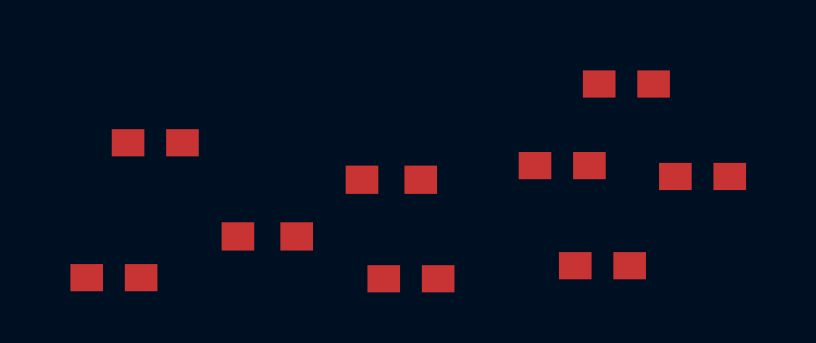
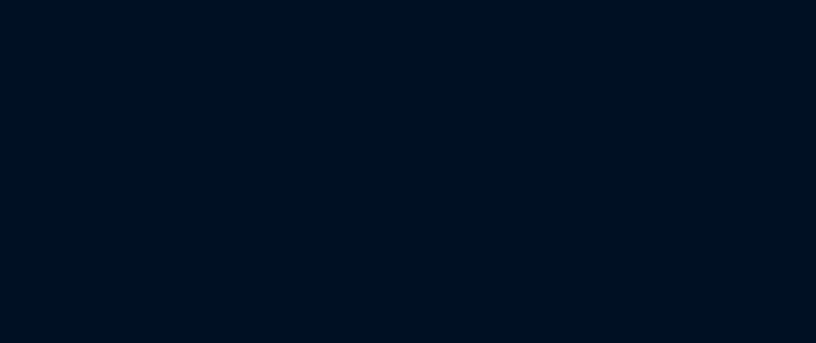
part: (626, 83) -> none
part: (155, 142) -> none
part: (562, 165) -> none
part: (702, 176) -> none
part: (391, 179) -> none
part: (267, 236) -> none
part: (602, 265) -> none
part: (113, 277) -> none
part: (410, 278) -> none

